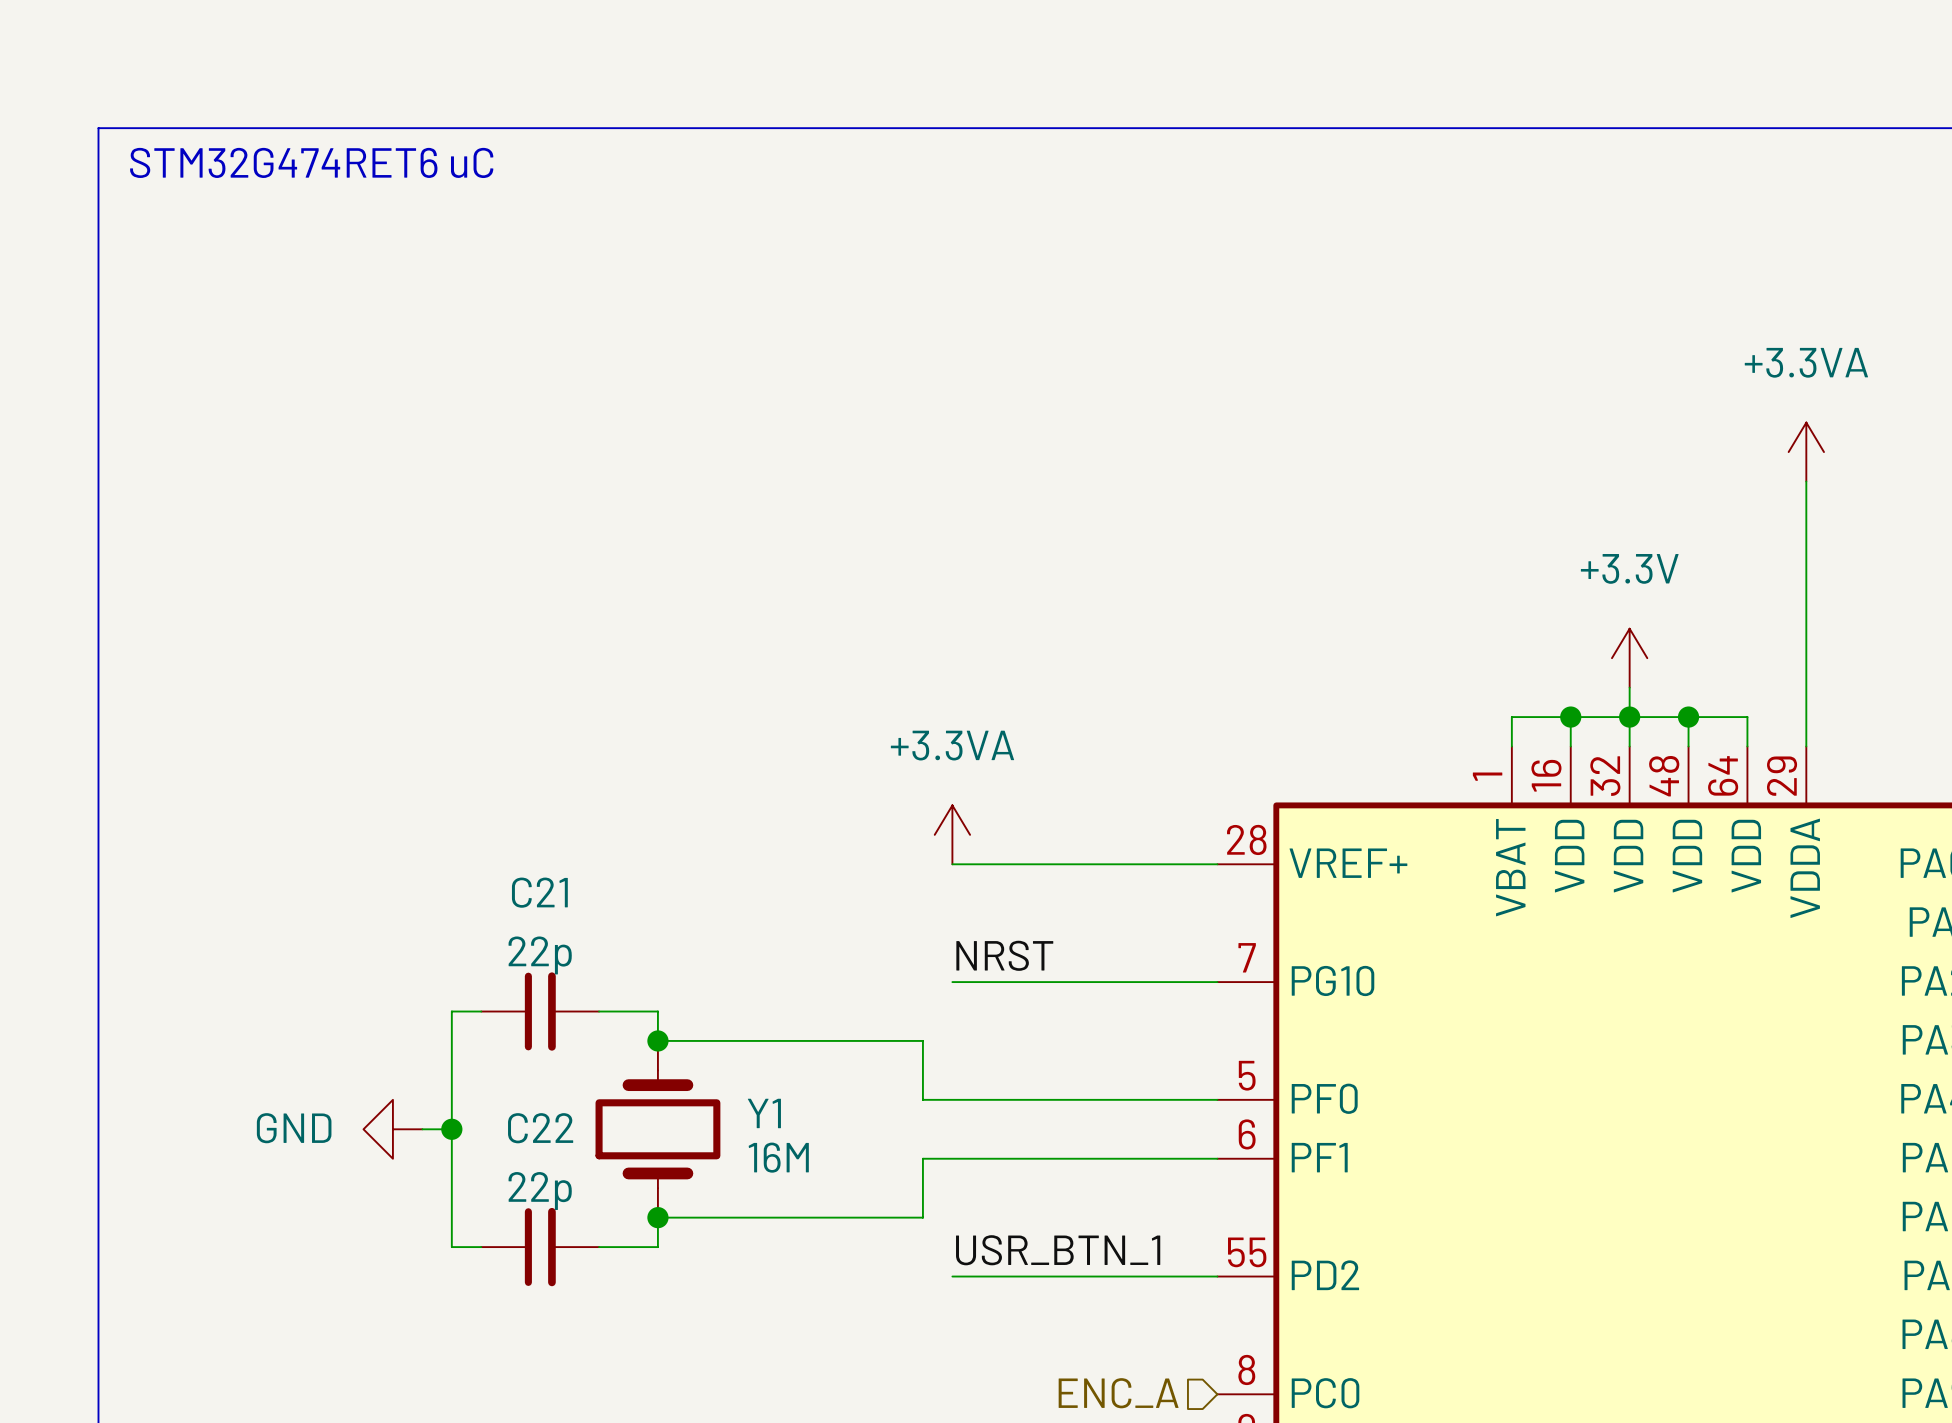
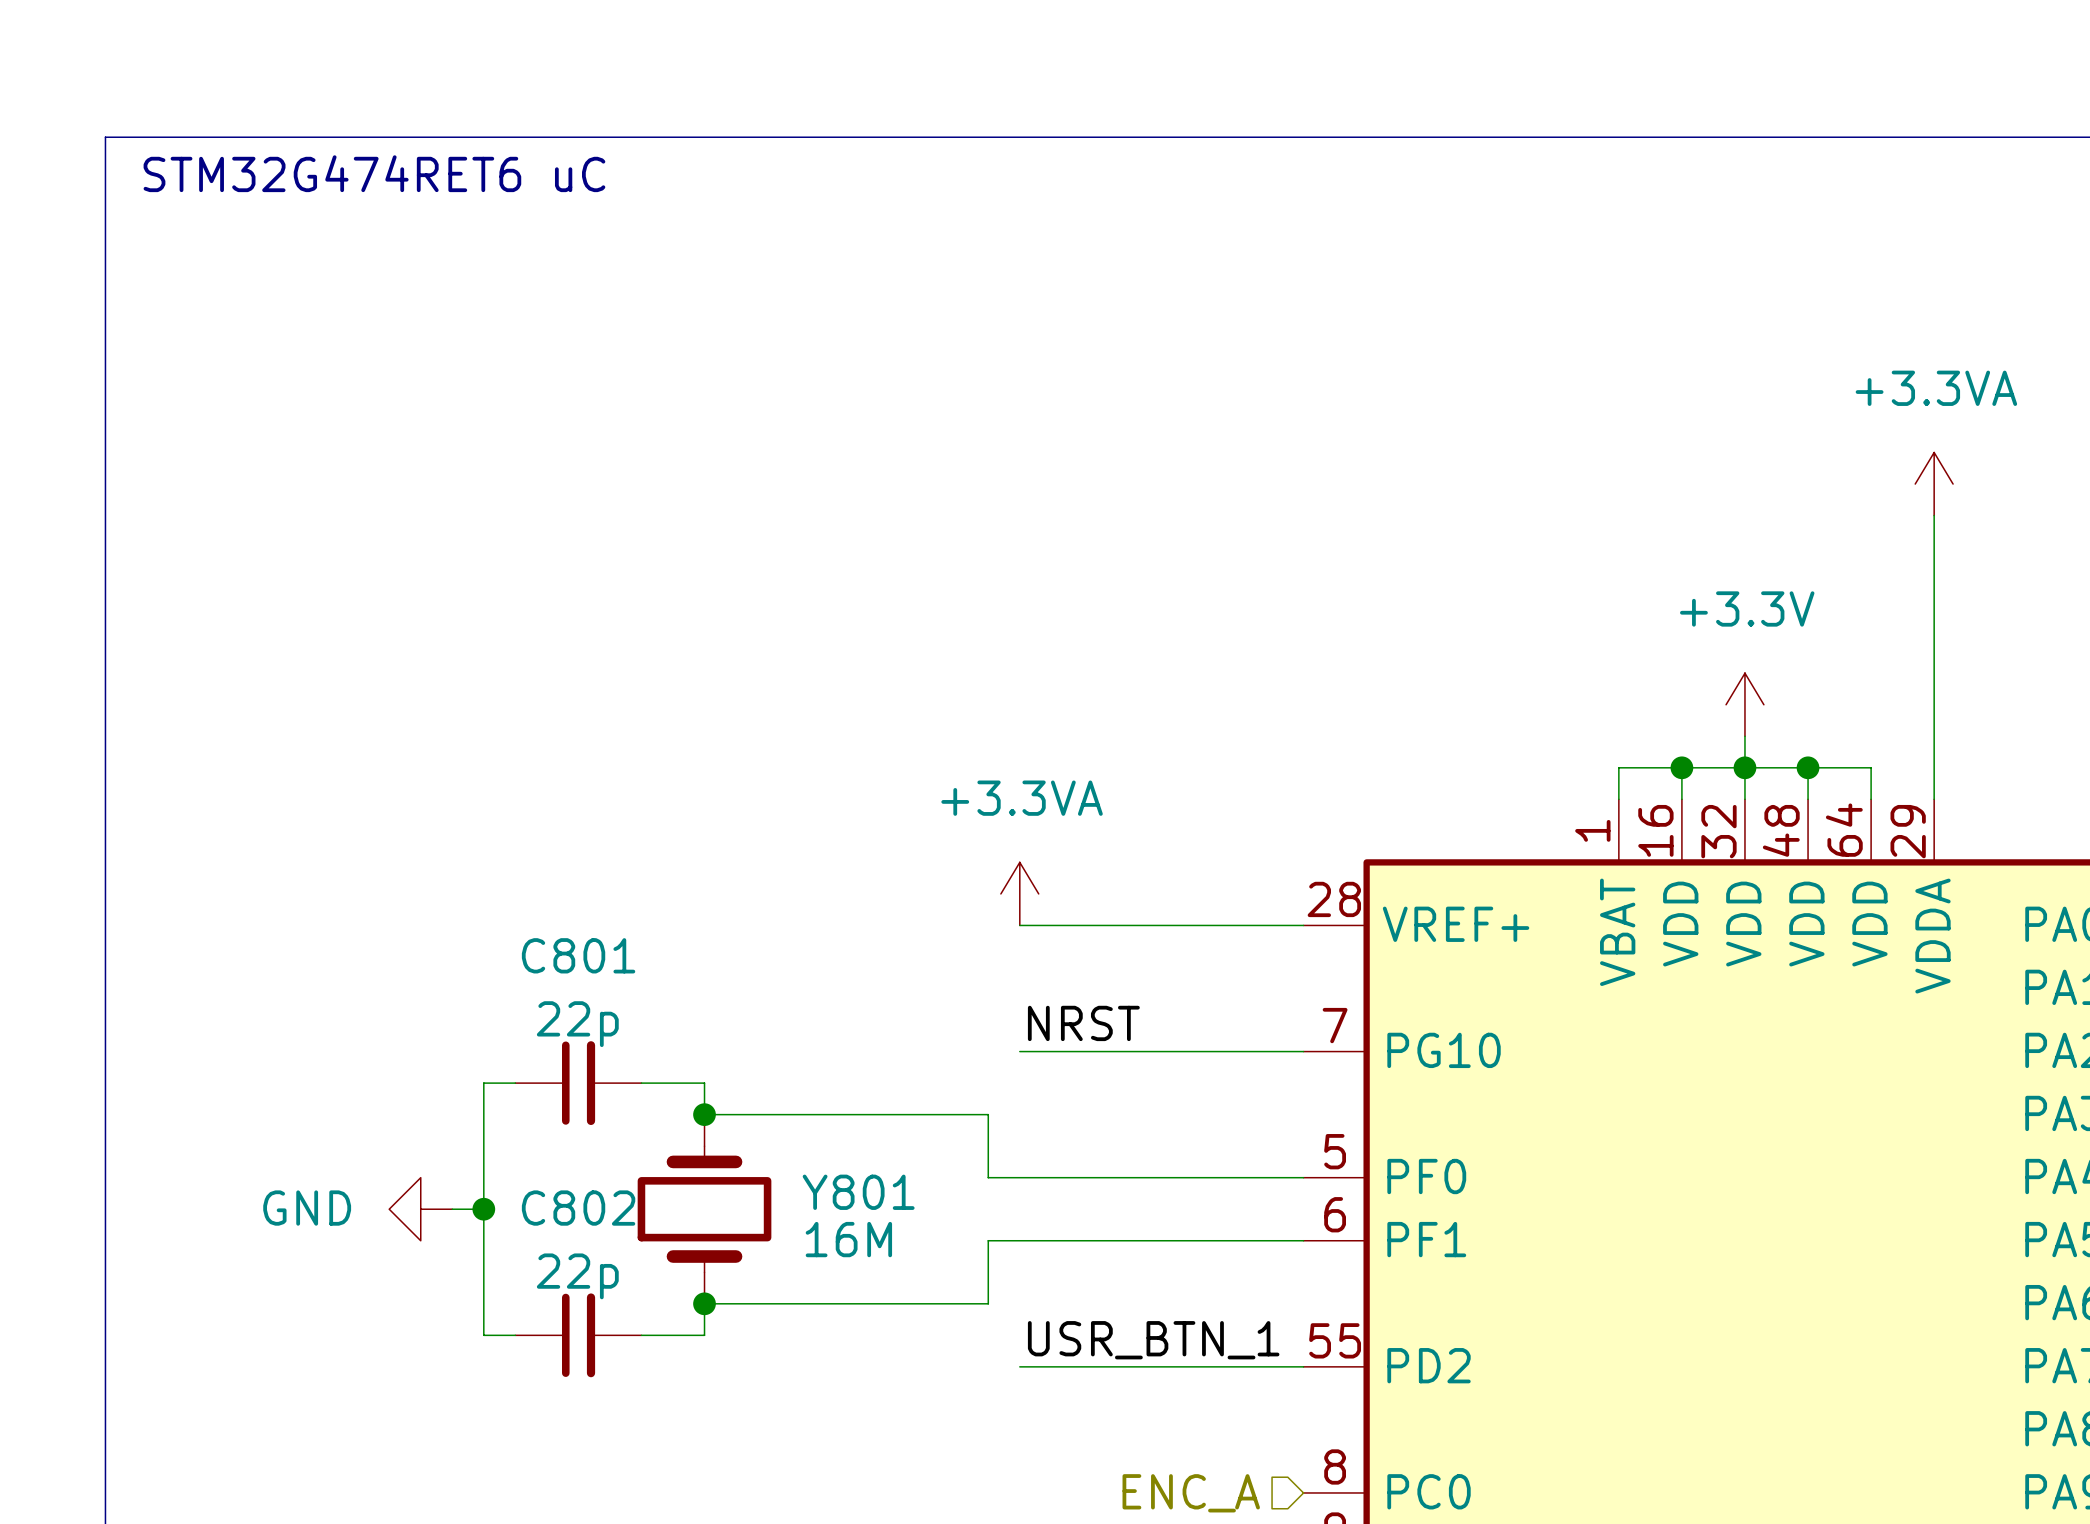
C21 name: C21 (539, 892) -> C801 (578, 955)
Y1 name: Y1 (764, 1113) -> Y801 (858, 1192)
C22 name: C22 (540, 1128) -> C802 (578, 1208)

